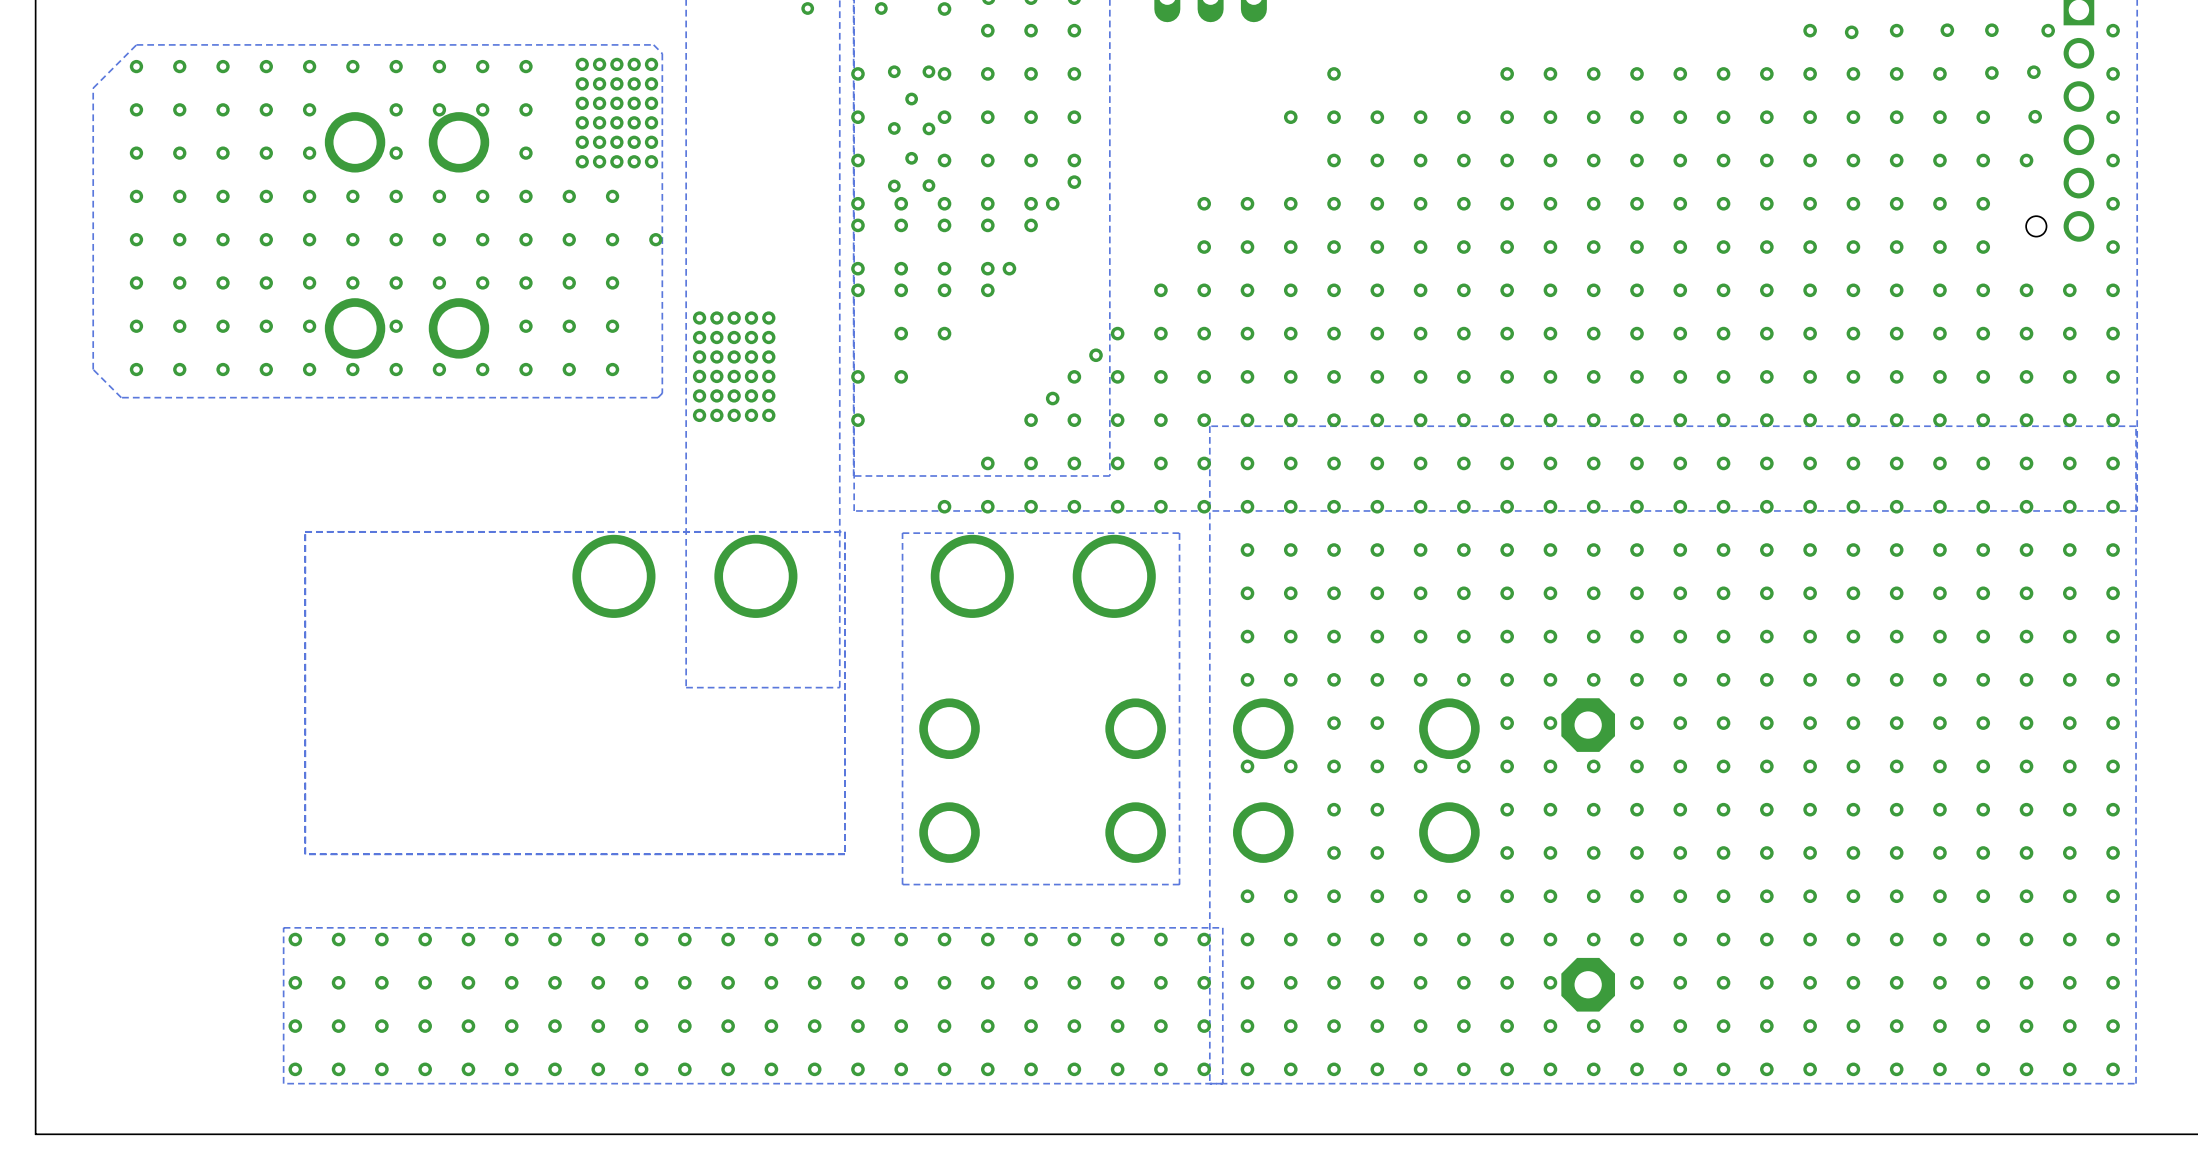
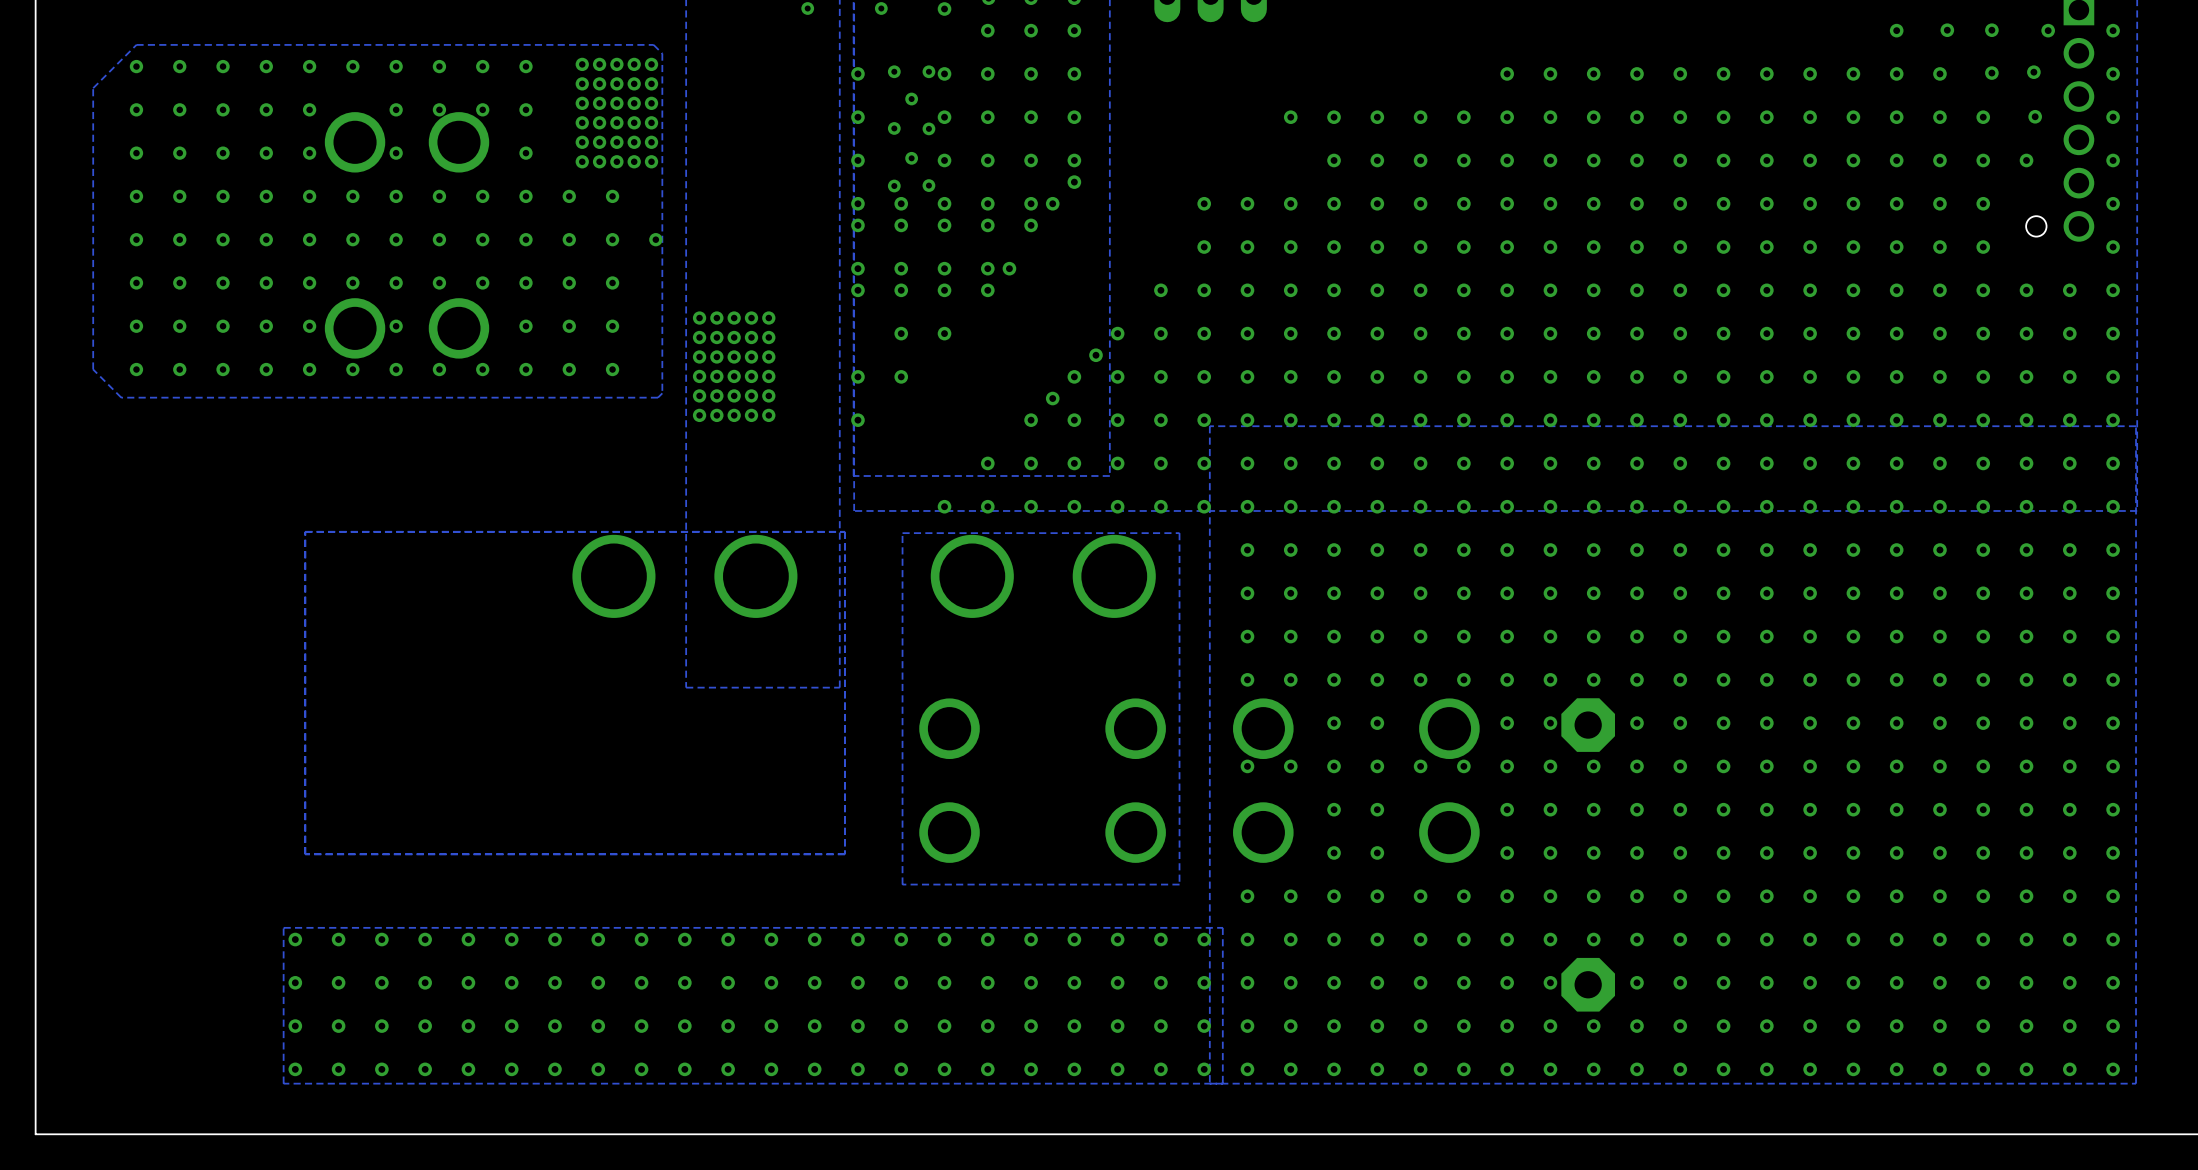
via: (1810, 30) -> none
via: (1851, 32) -> none
via: (1334, 73) -> none

